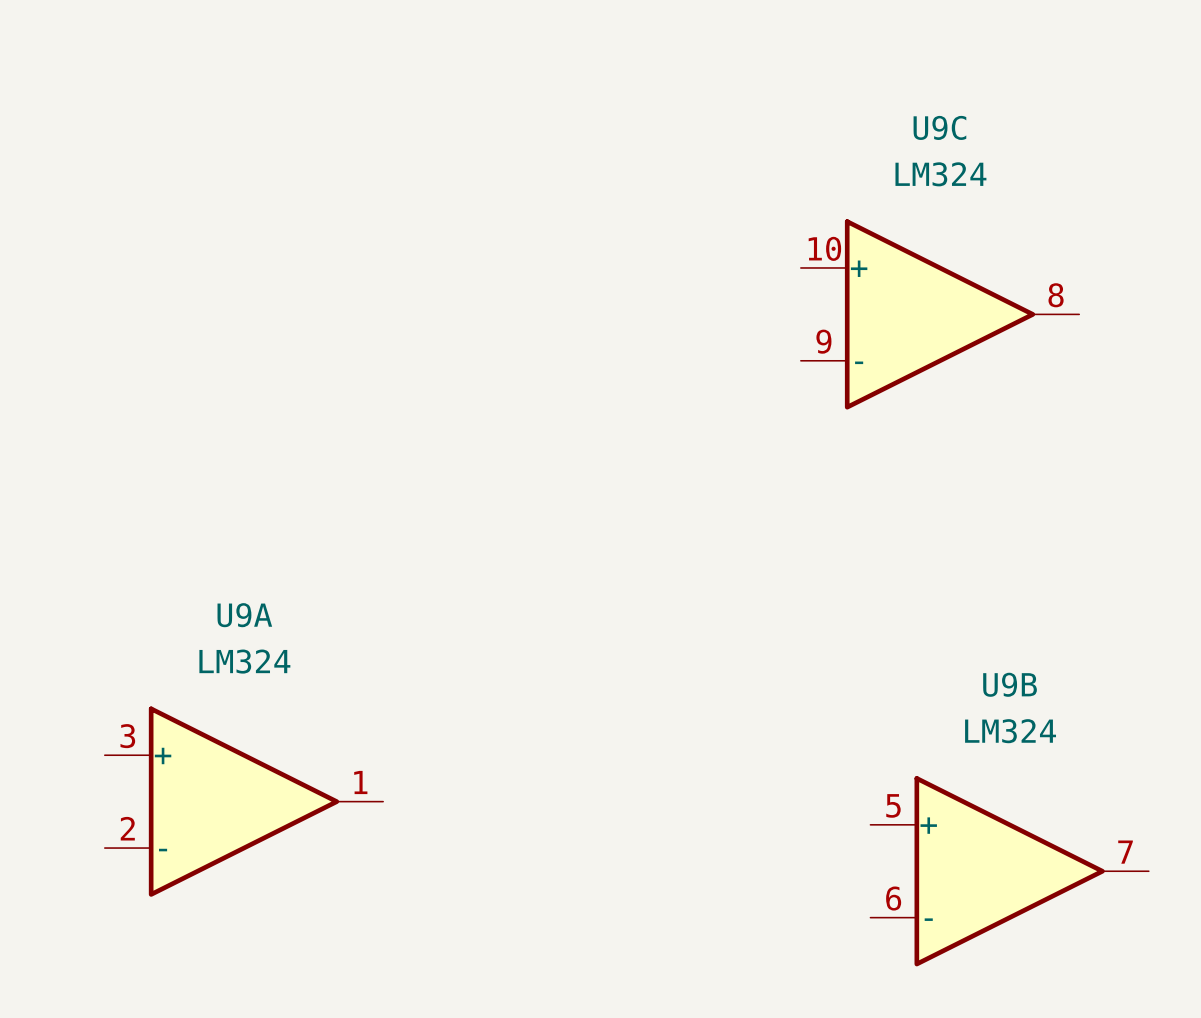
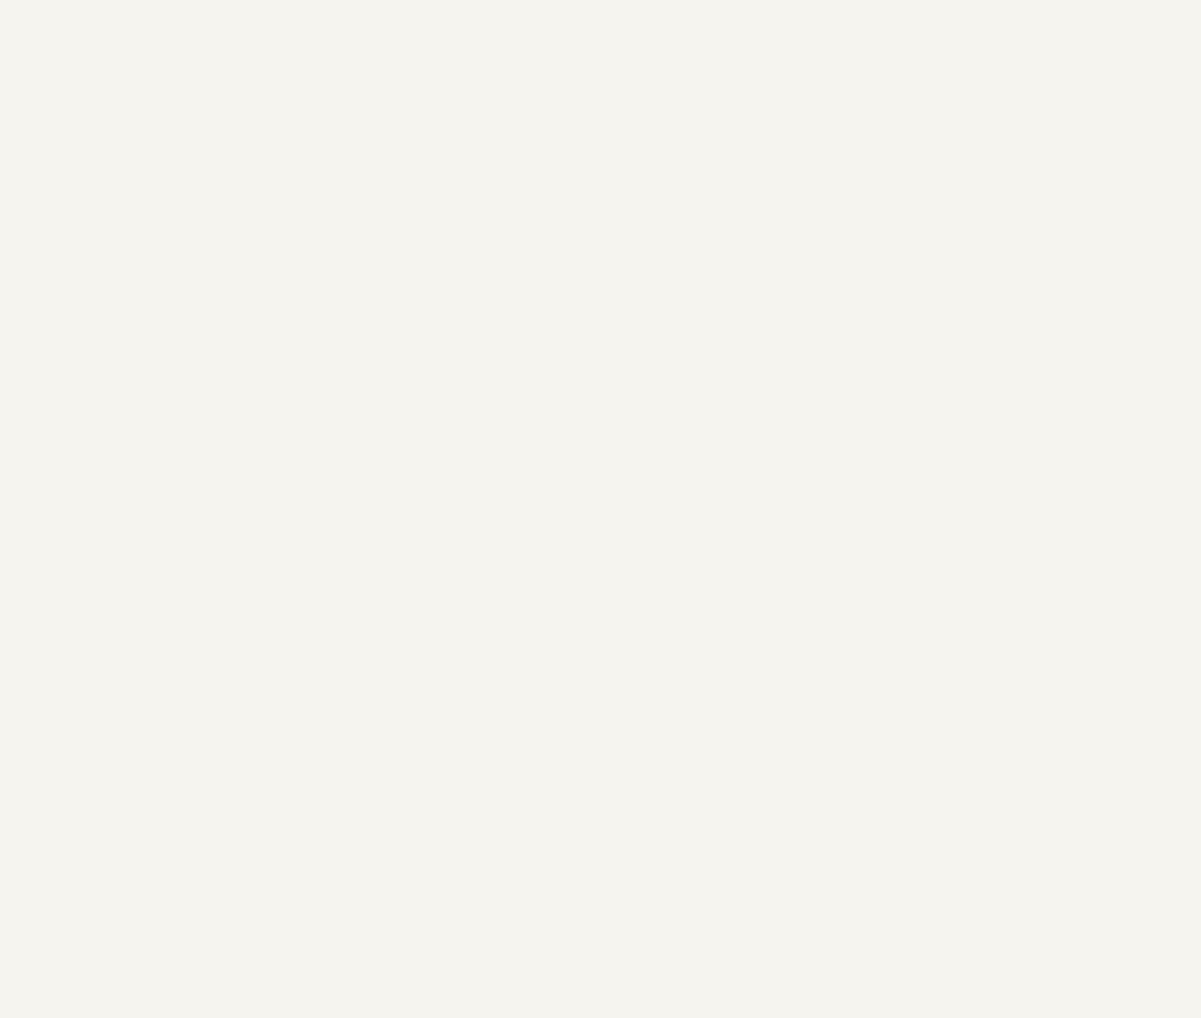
U9C: LM324 (940, 314) -> none
U9A: LM324 (243, 801) -> none
U9B: LM324 (1009, 871) -> none

